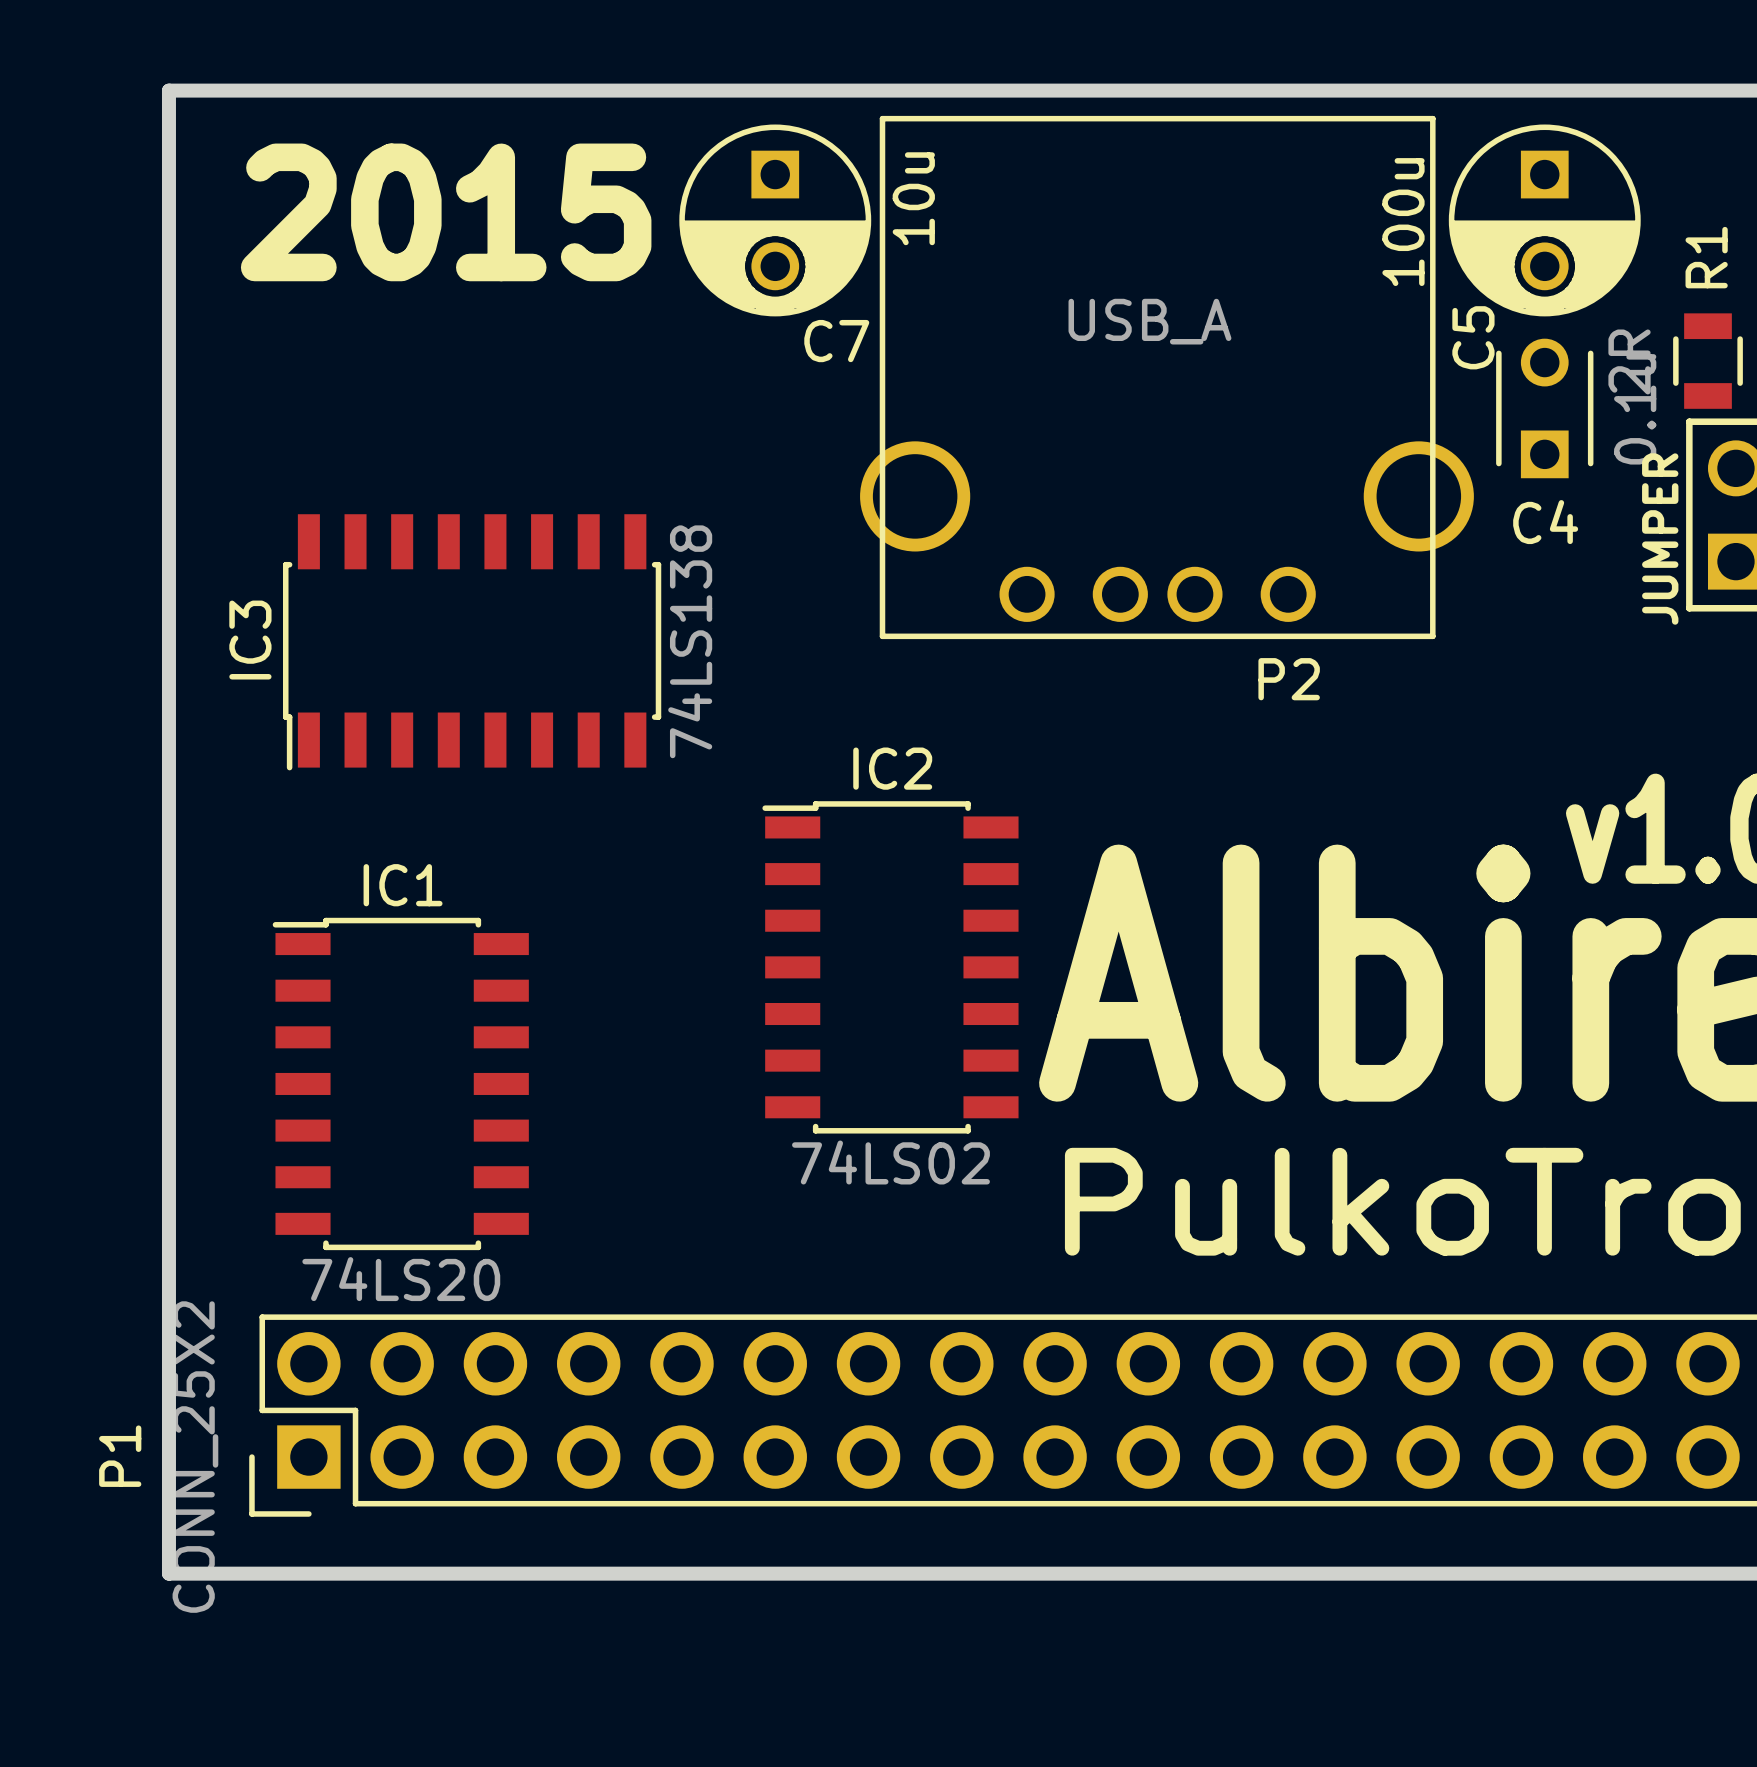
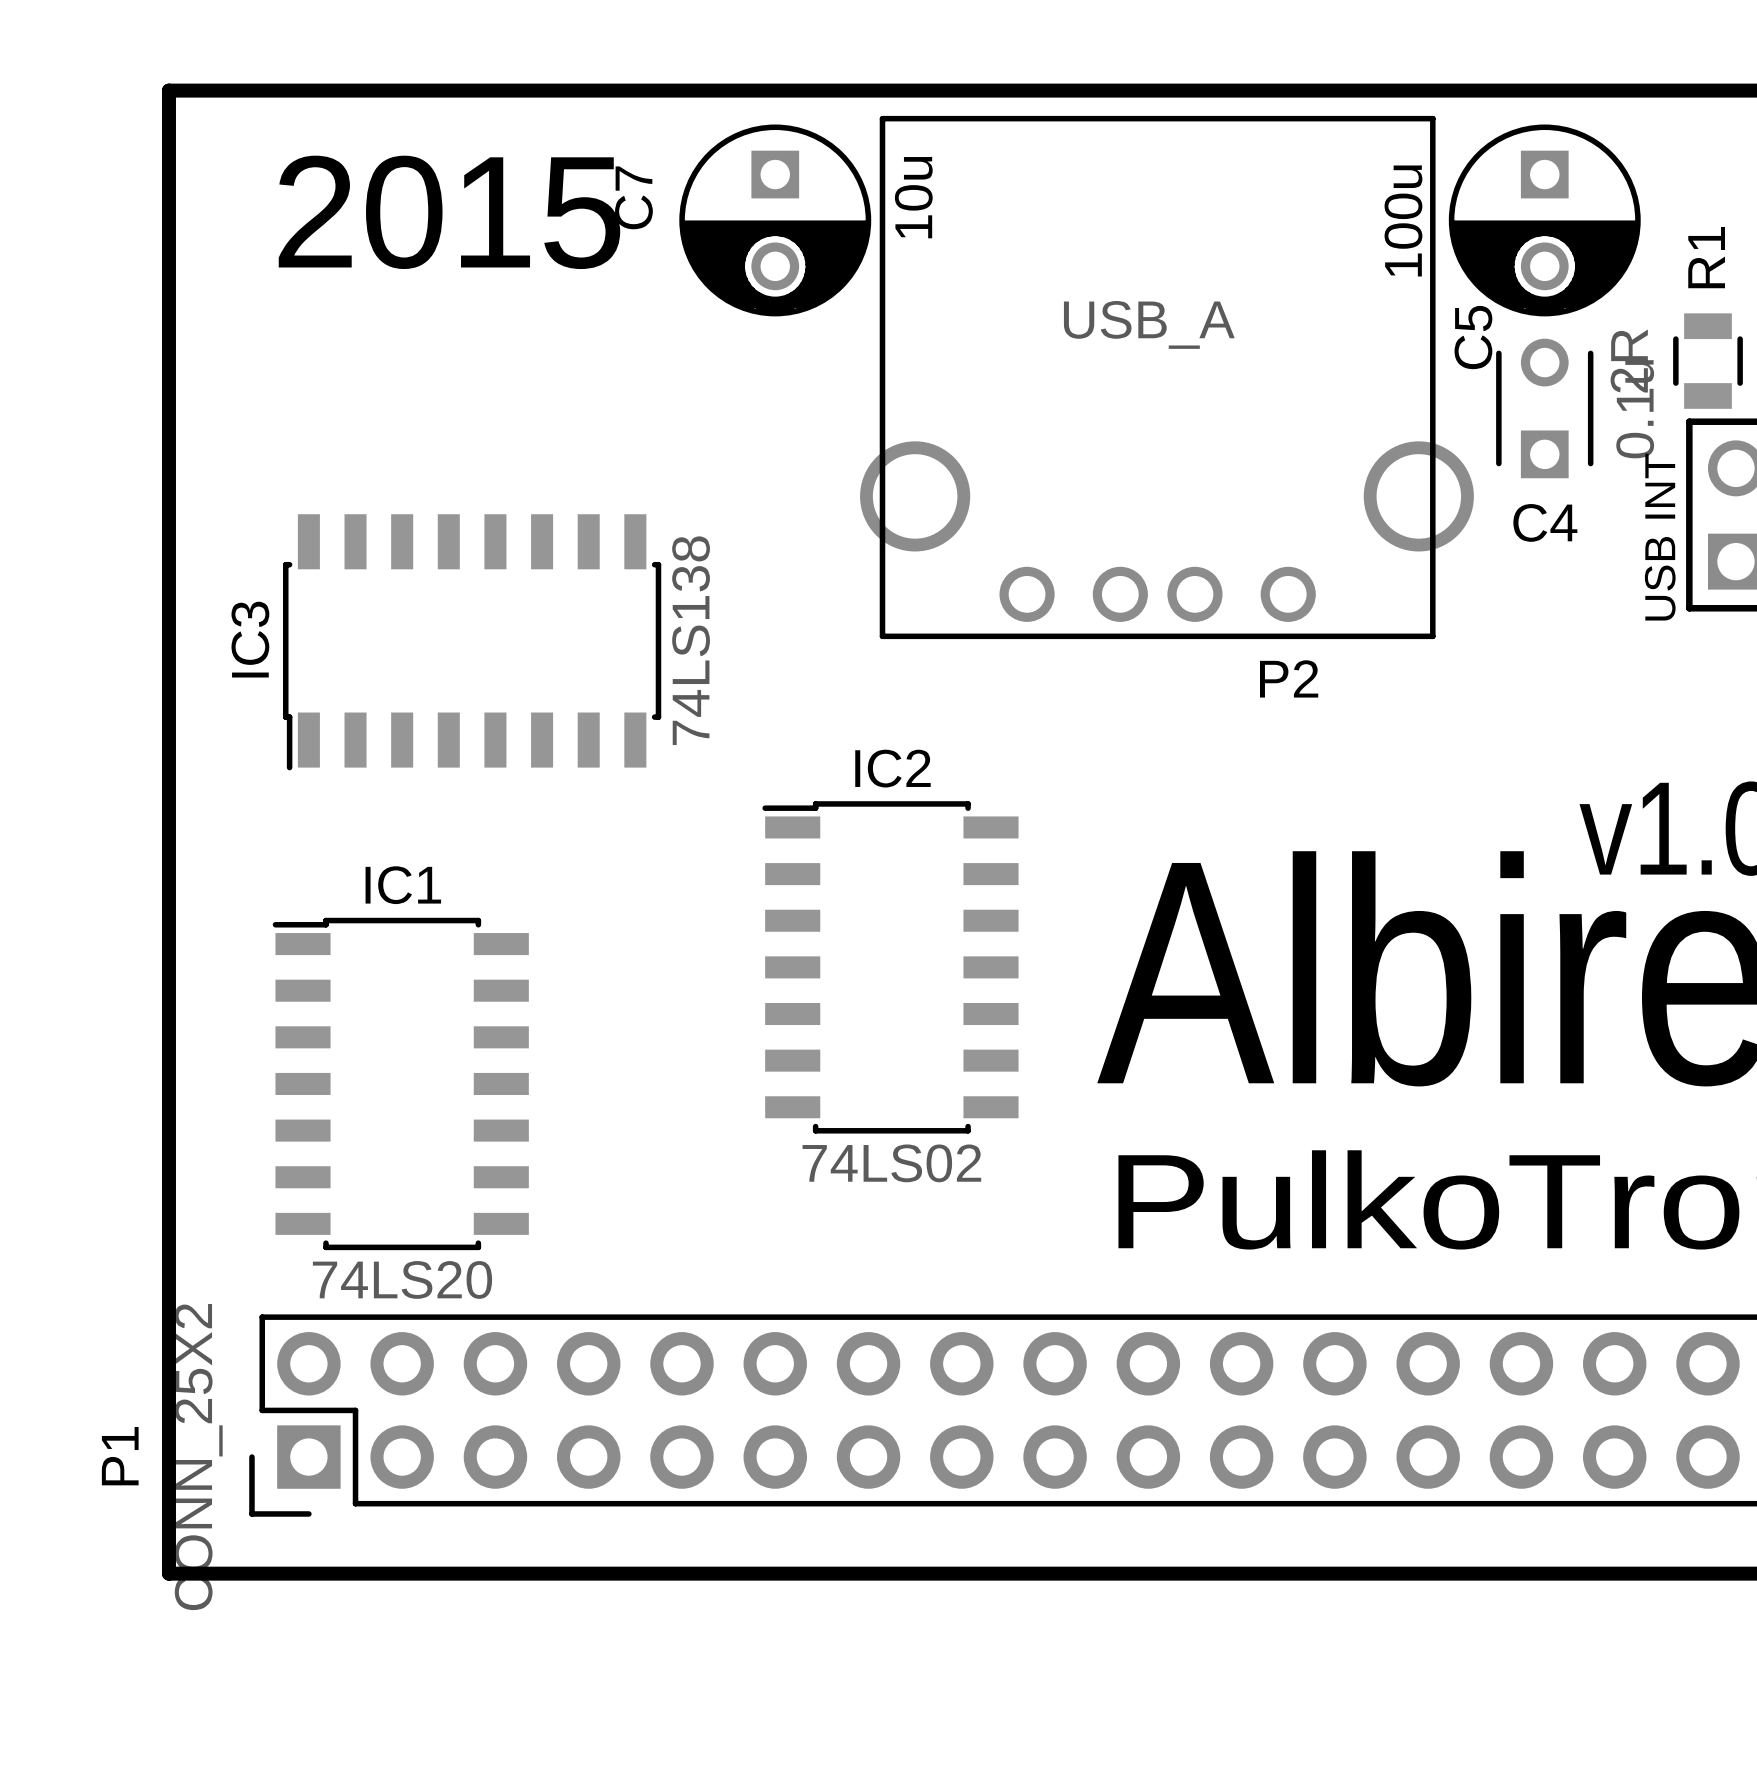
C7 name rotation: 0° (836, 341) -> 90° counterclockwise (633, 197)
C7 name position: C7 (836, 341) -> C7 (633, 197)
part value: JUMPER (1660, 539) -> USB INT (1660, 537)

